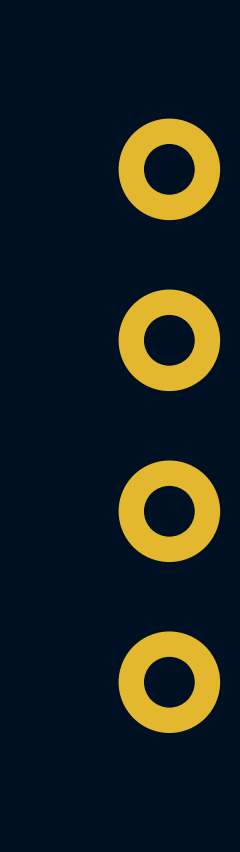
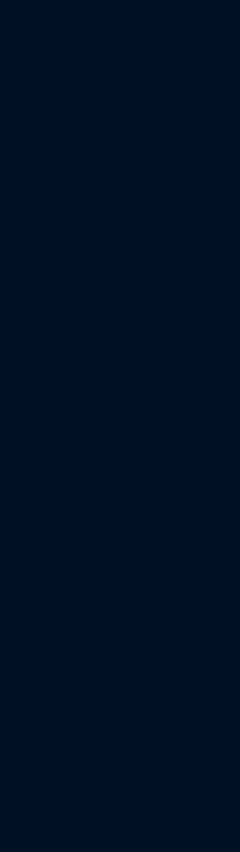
part: (169, 169) -> none
part: (169, 340) -> none
part: (169, 511) -> none
part: (169, 682) -> none

